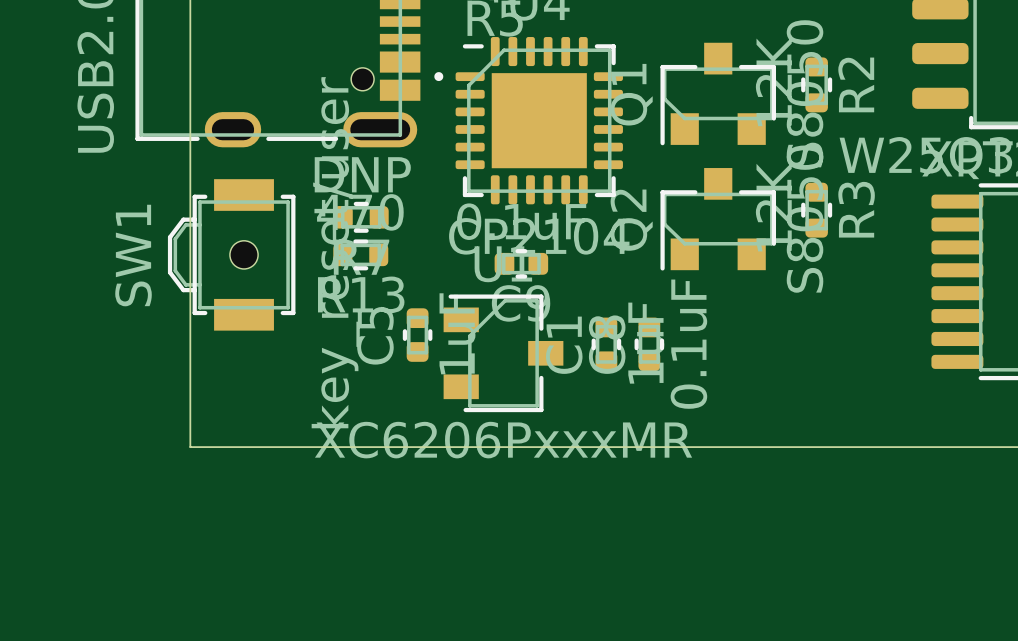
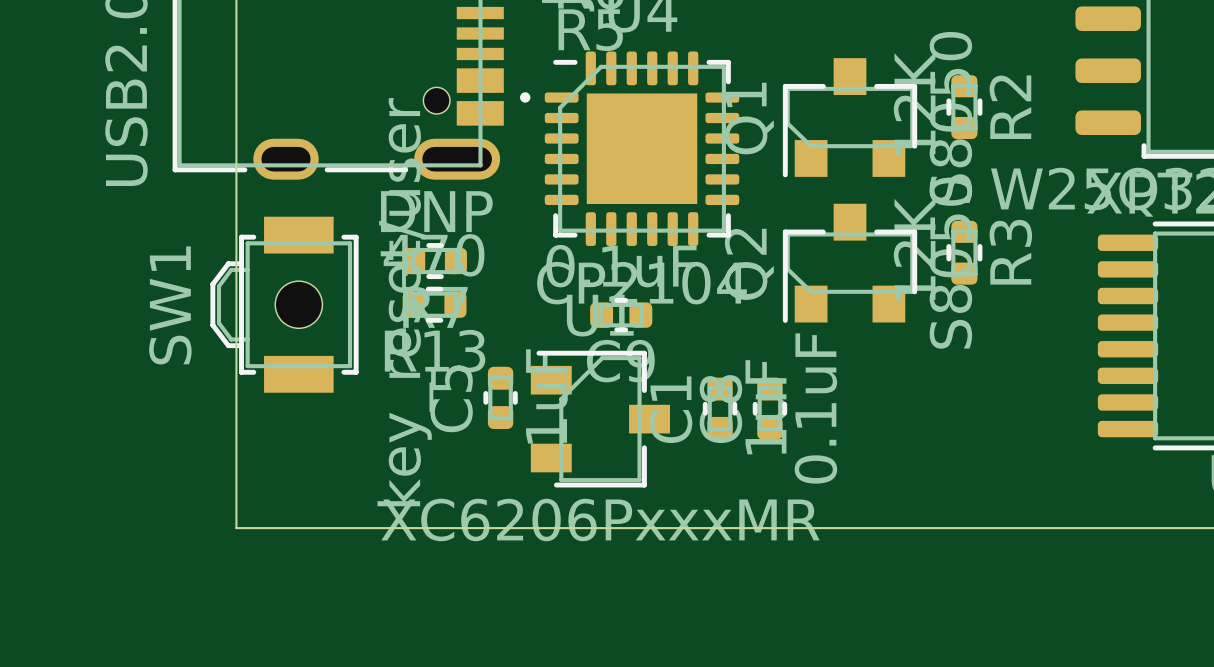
SW1 footprint: [167, 179, 296, 331] -> [210, 216, 359, 393]

